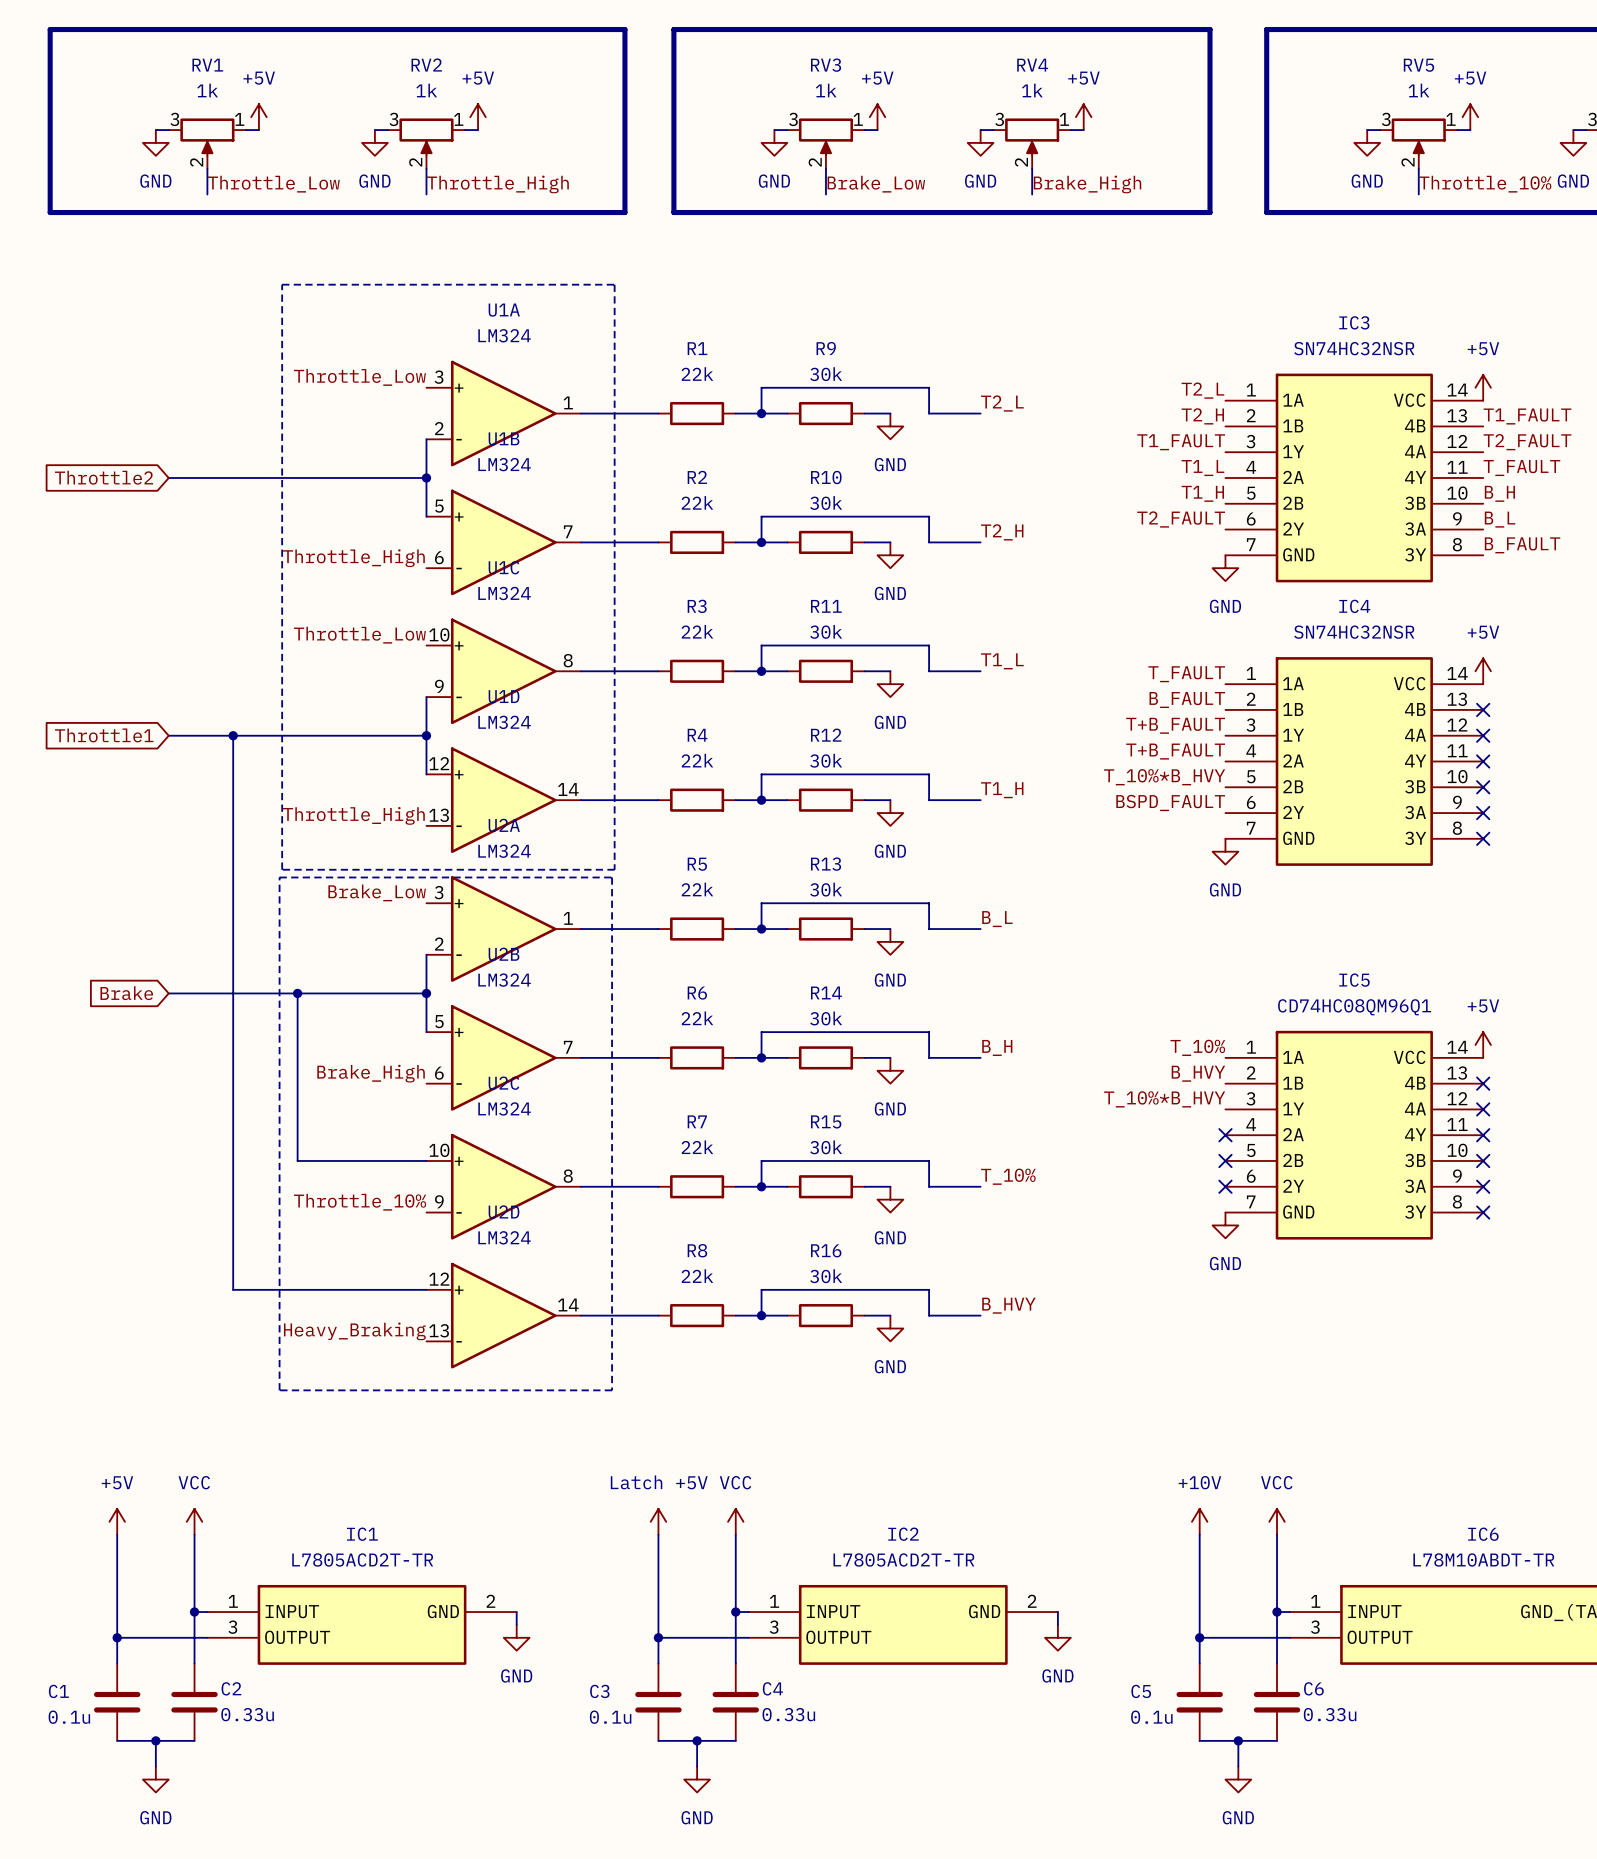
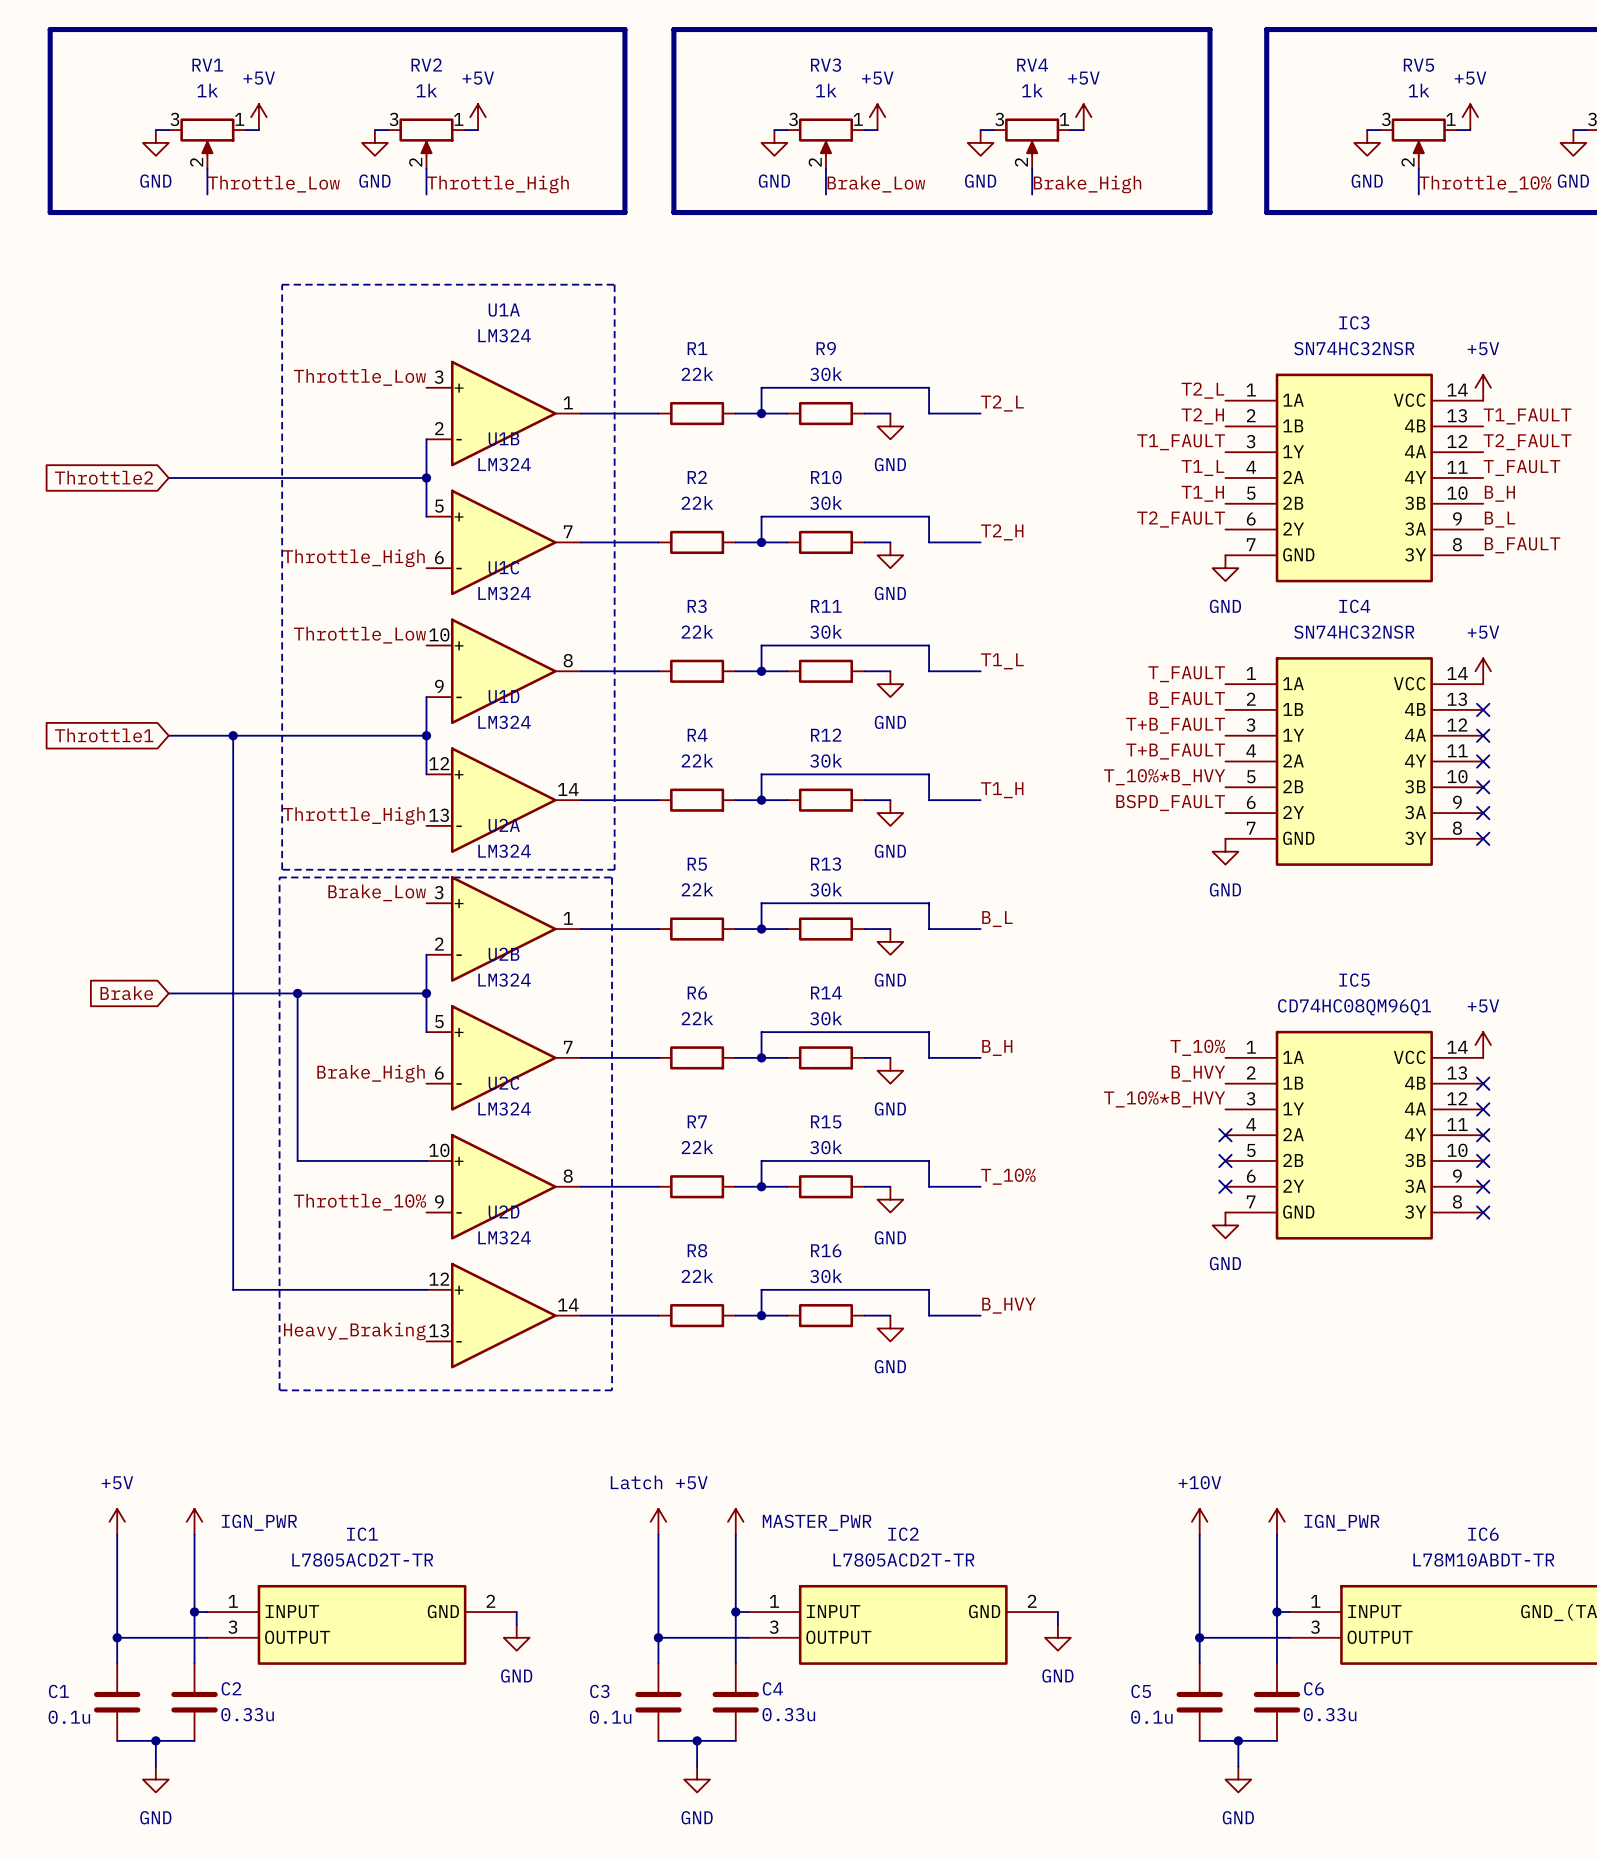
power symbol: VCC (194, 1521) -> IGN_PWR (194, 1521)
power symbol: VCC (735, 1521) -> MASTER_PWR (735, 1521)
power symbol: VCC (1277, 1521) -> IGN_PWR (1277, 1521)

